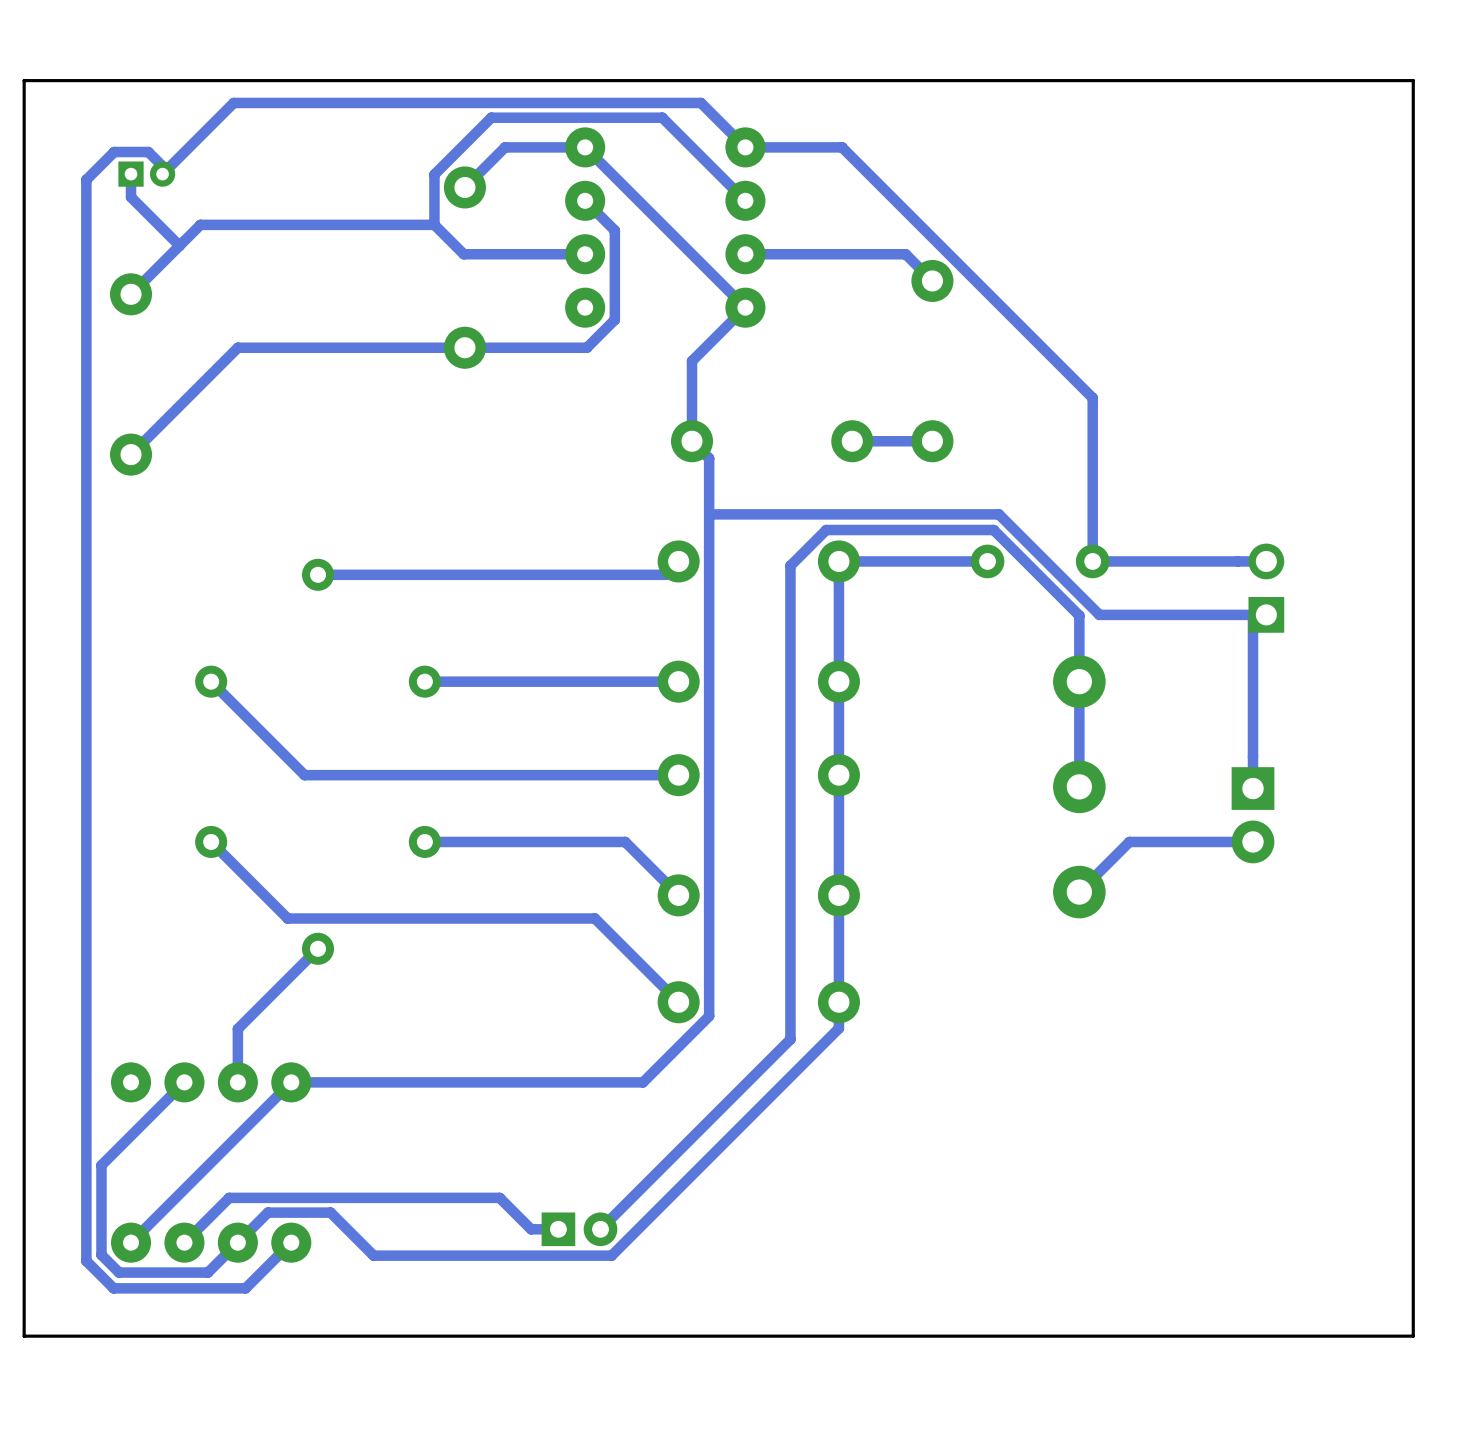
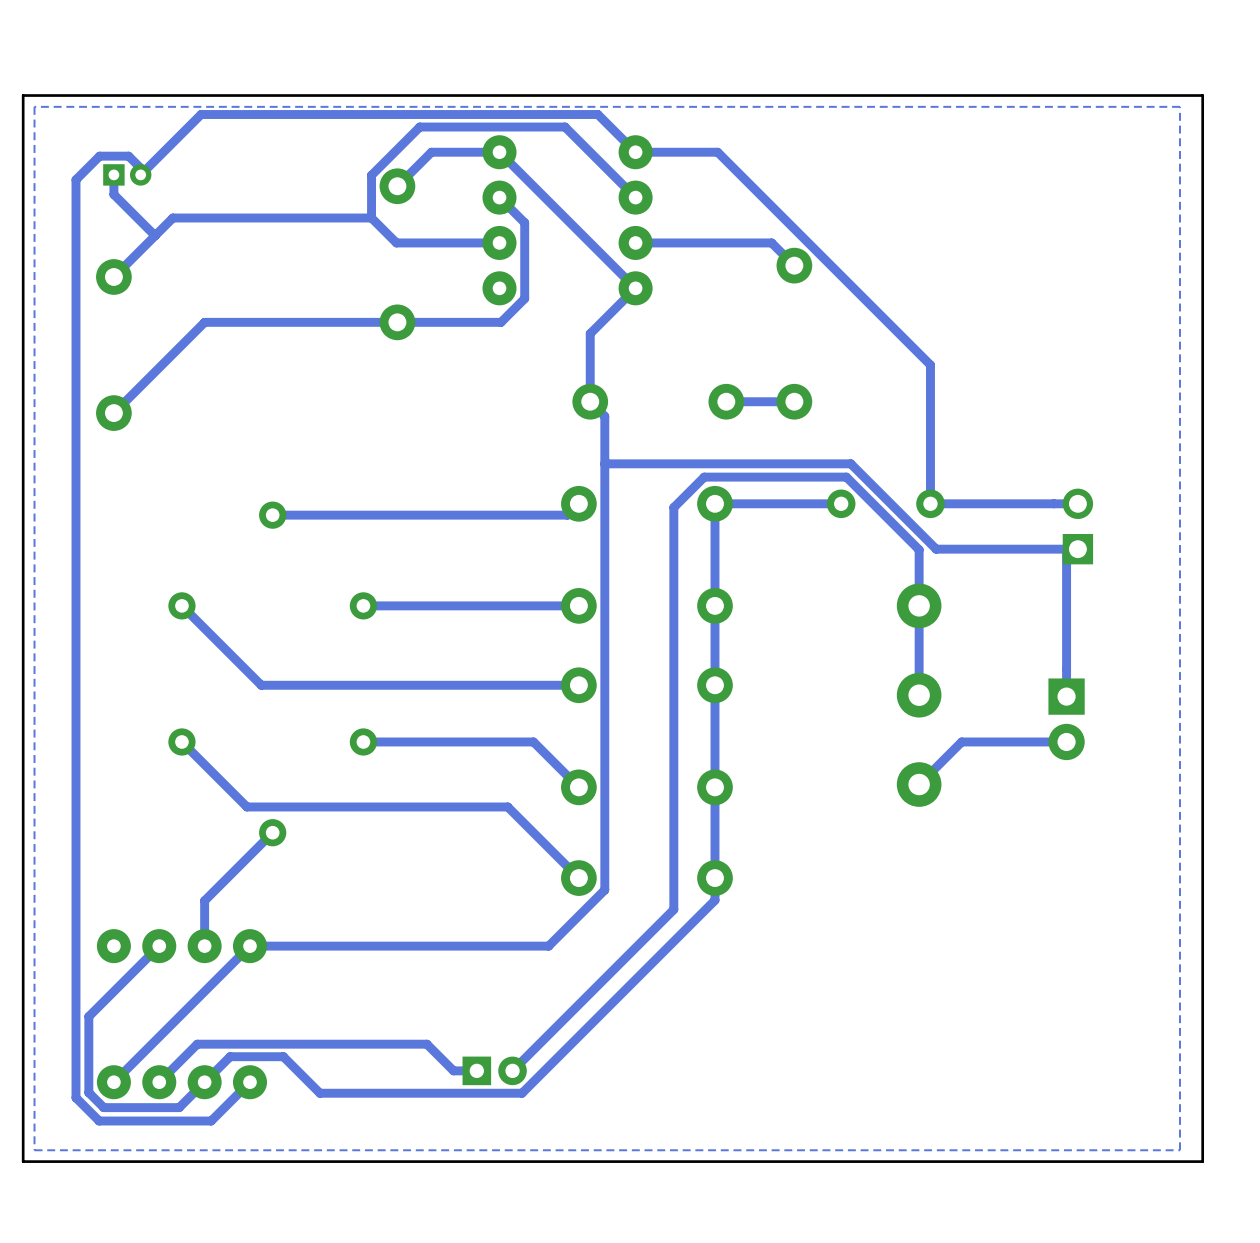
bottom zone outline: none -> (1179, 106) (1179, 1150) (34, 1150) (34, 106) (1179, 106)

